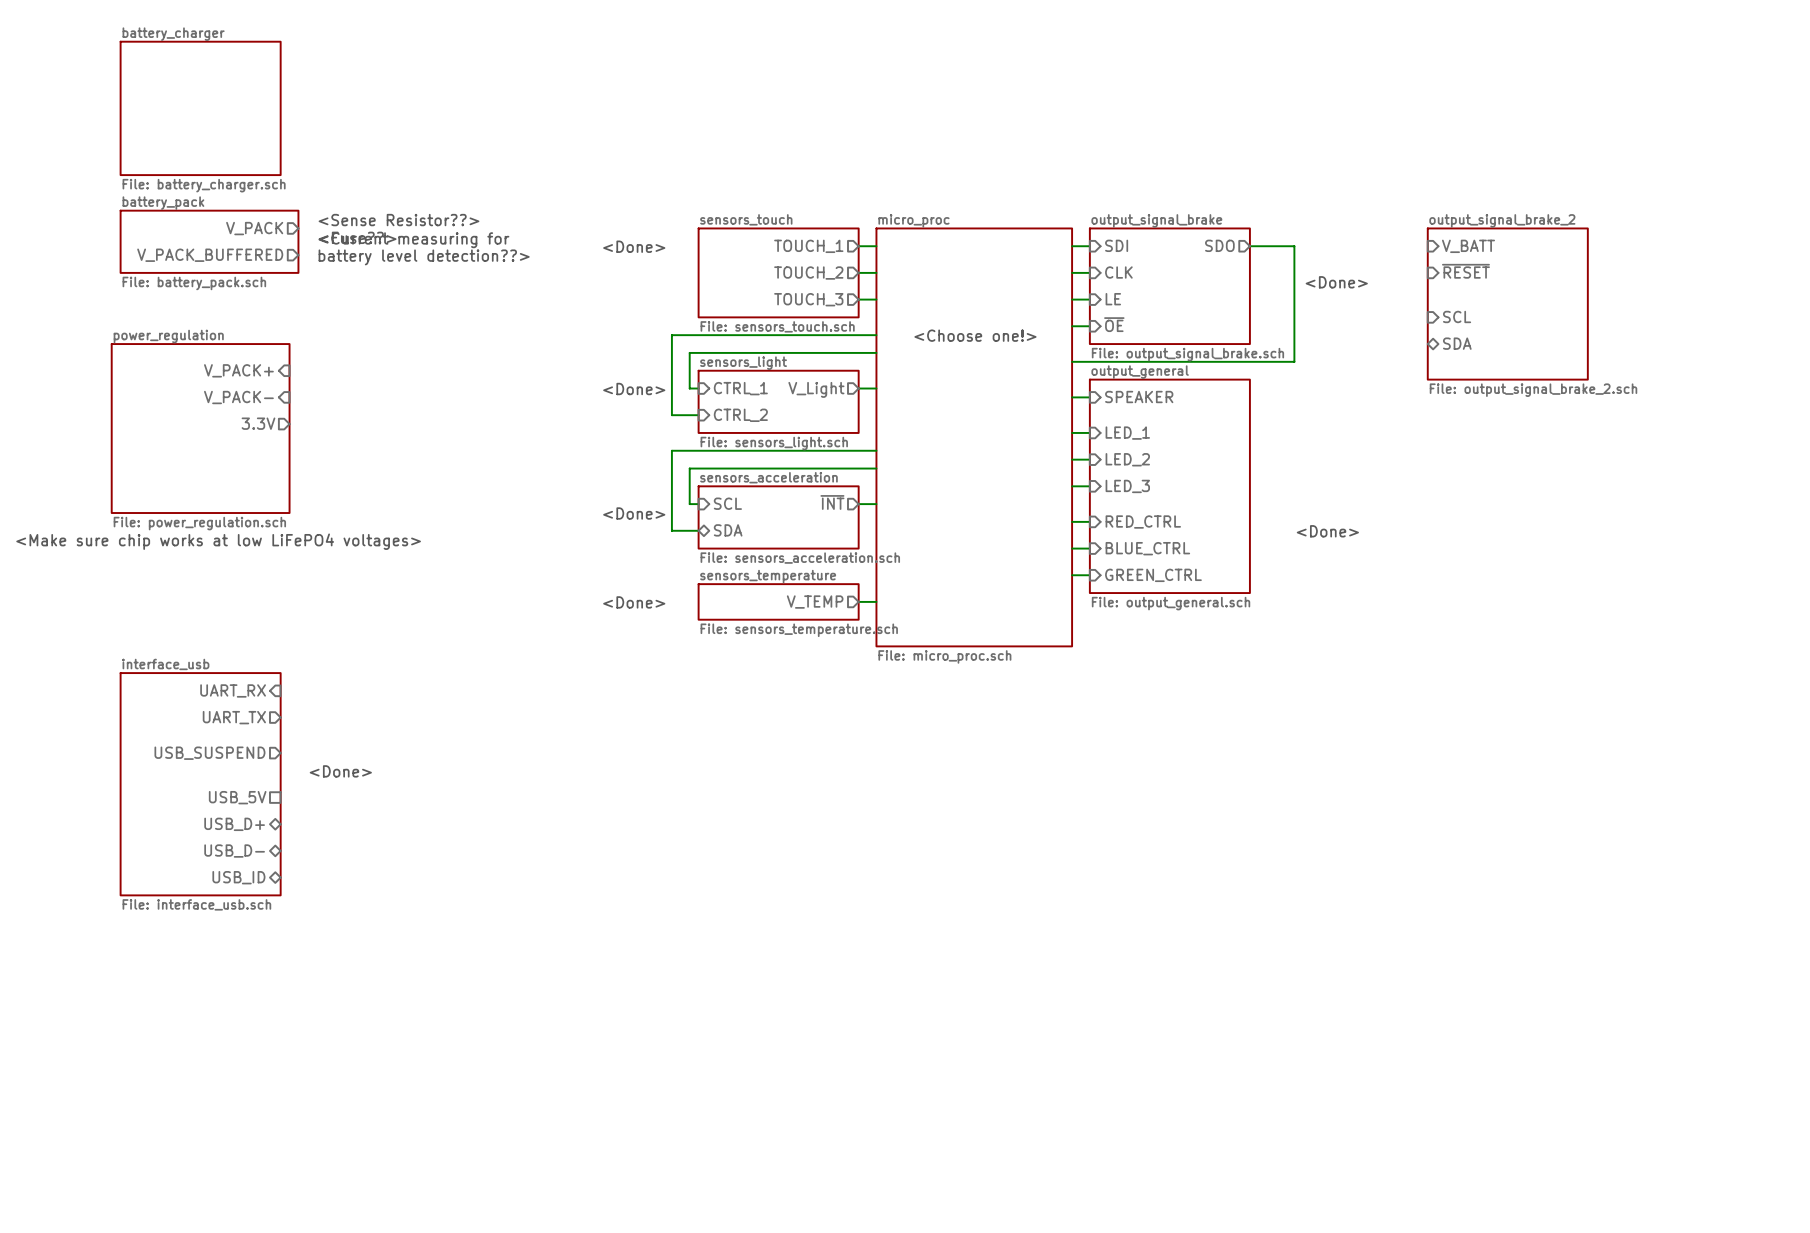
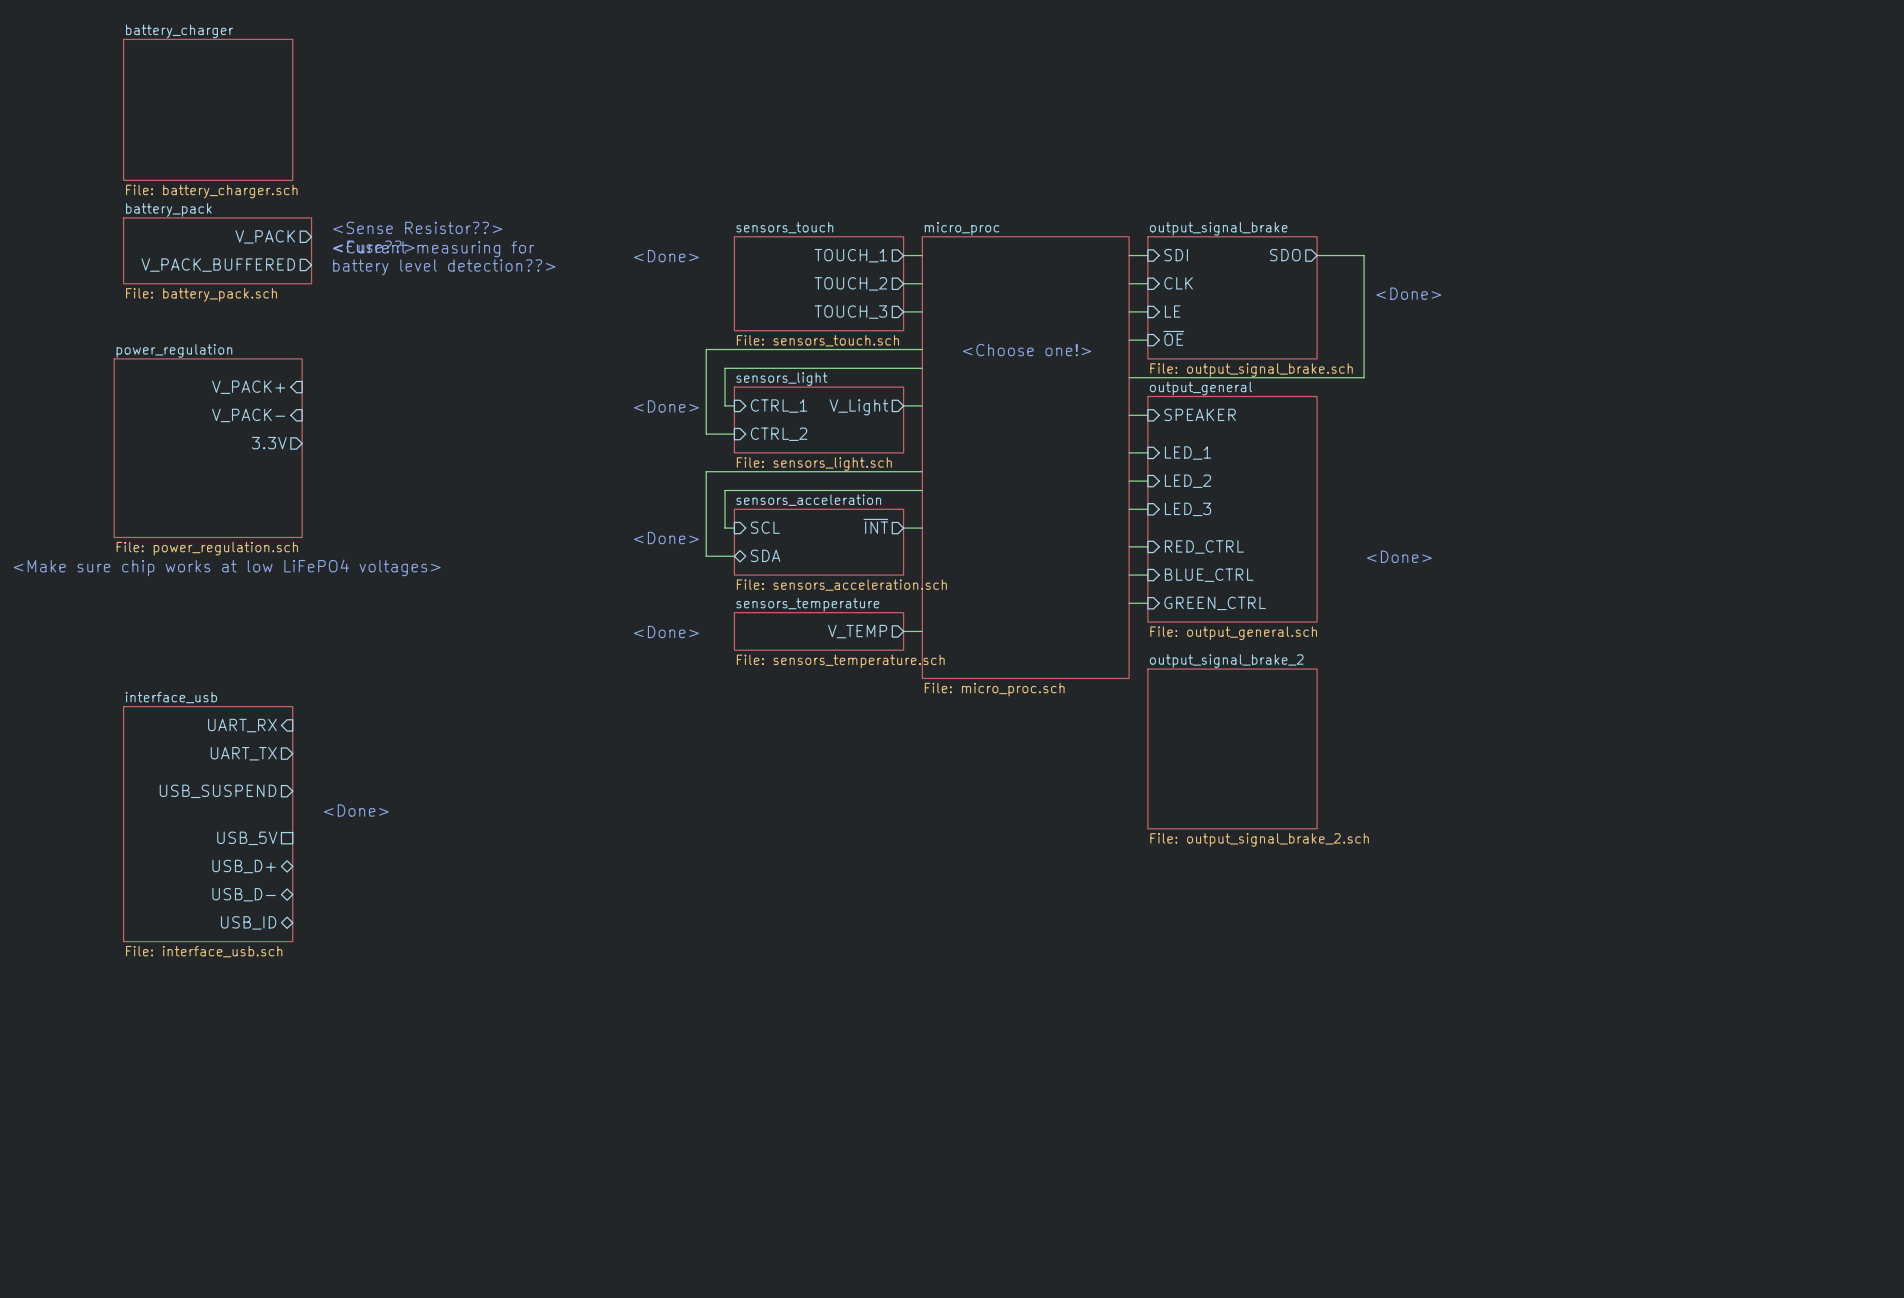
sheet pin: V_BATT (1468, 246) -> none
sheet pin: ~{RESET} (1465, 271) -> none
sheet output_signal_brake_2 position: (1507, 304) -> (1232, 748)
sheet pin: SCL (1457, 316) -> none
sheet pin: SDA (1457, 343) -> none

